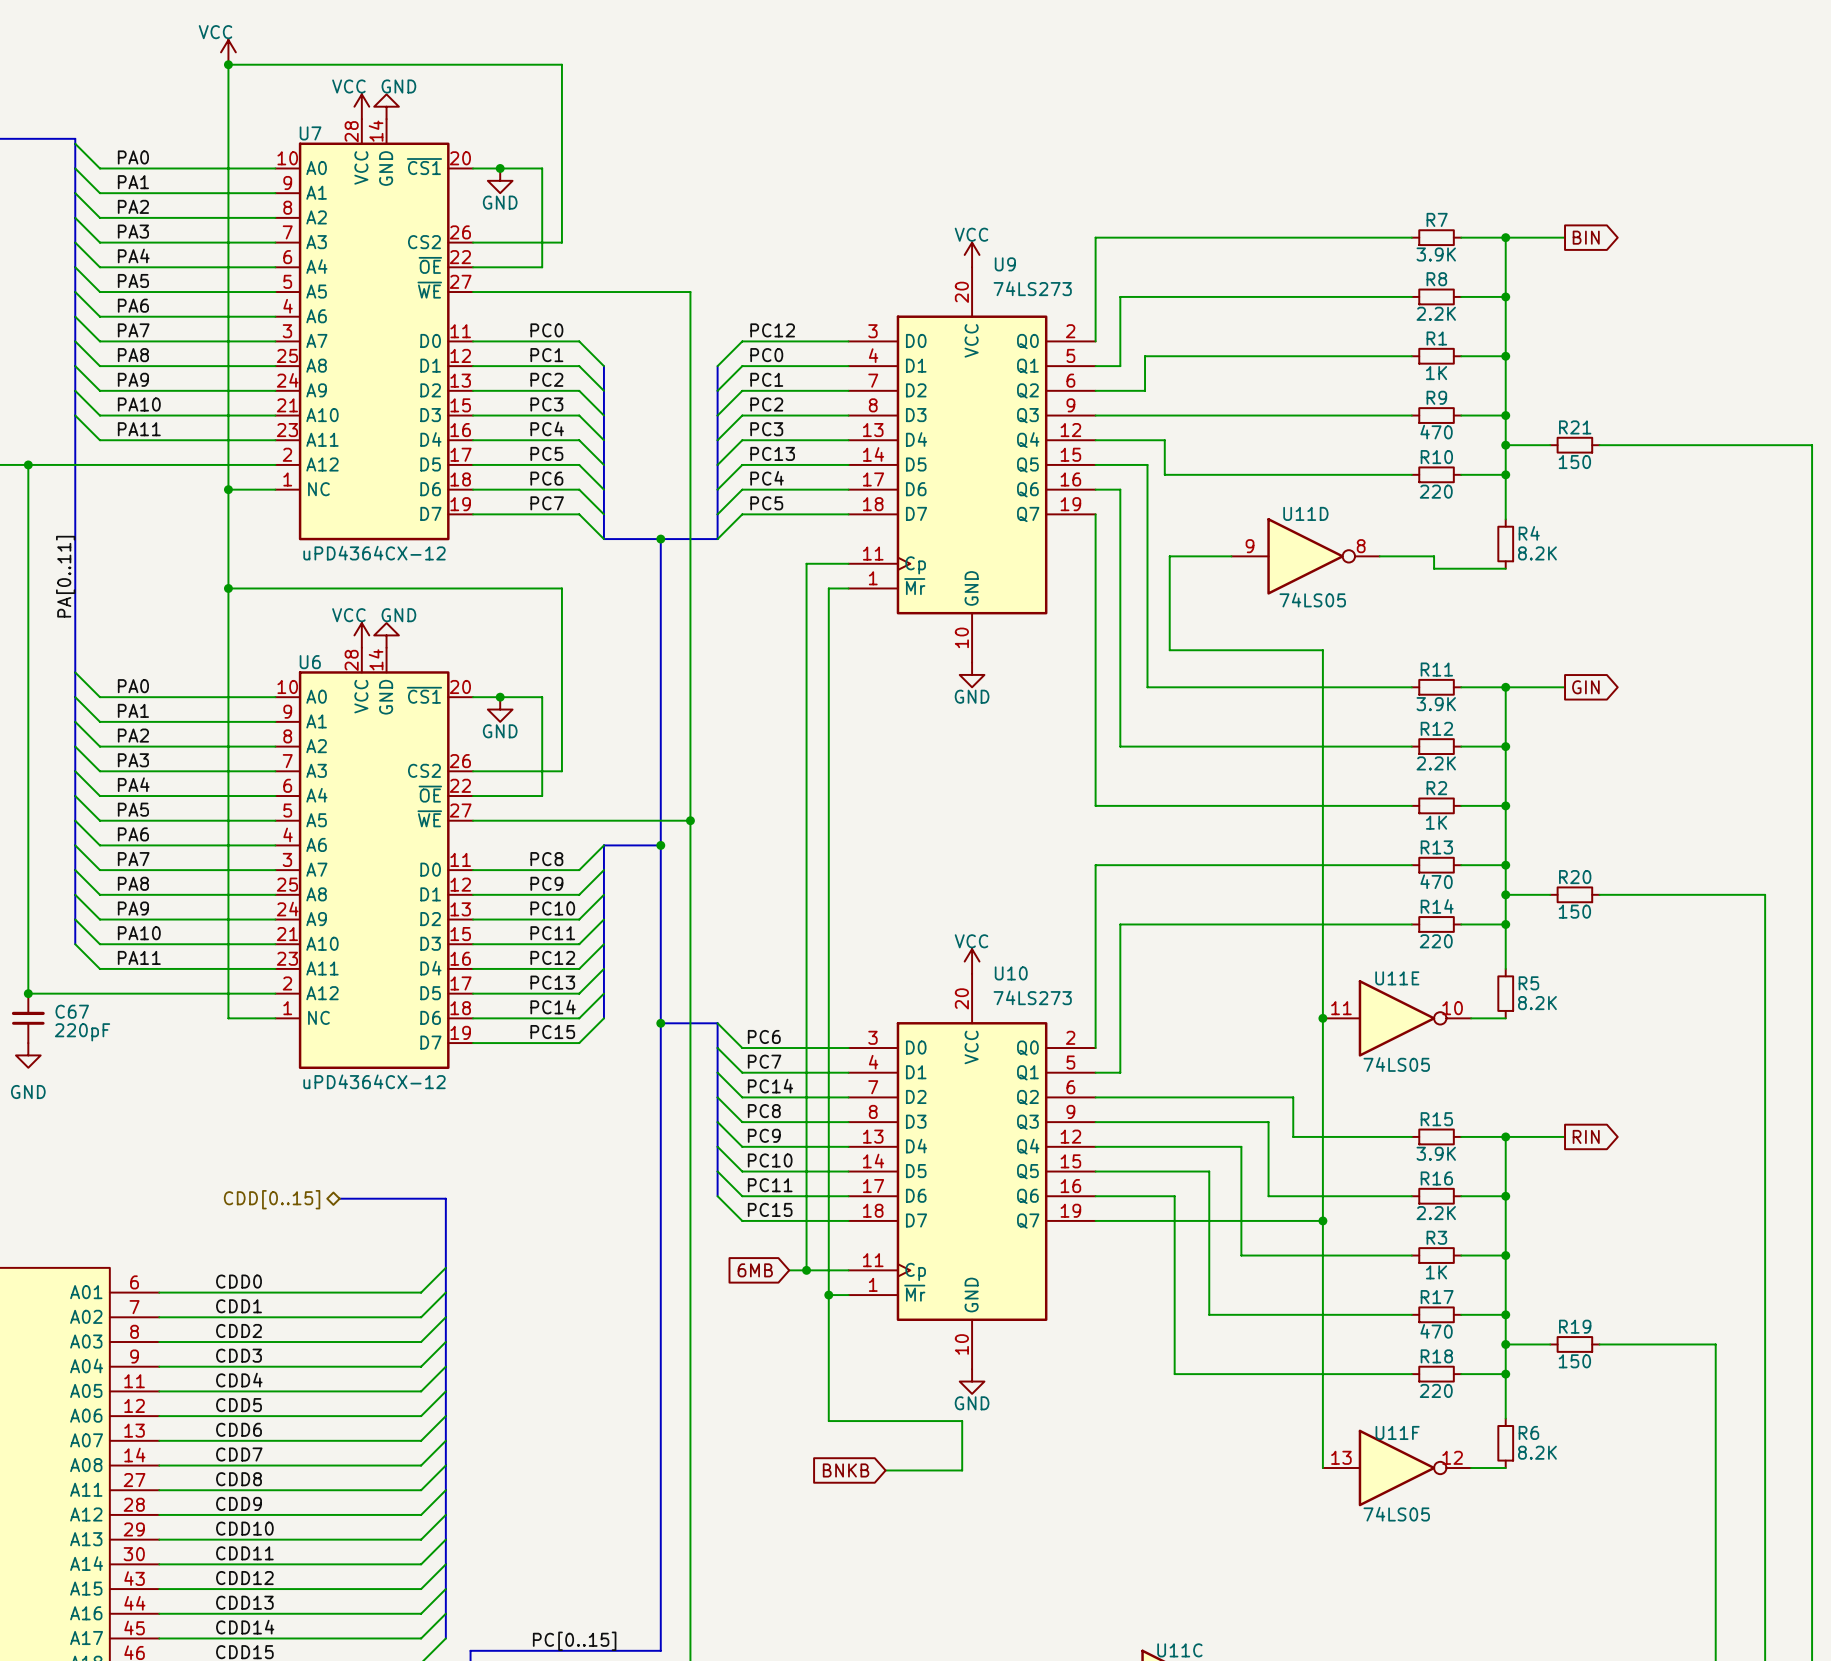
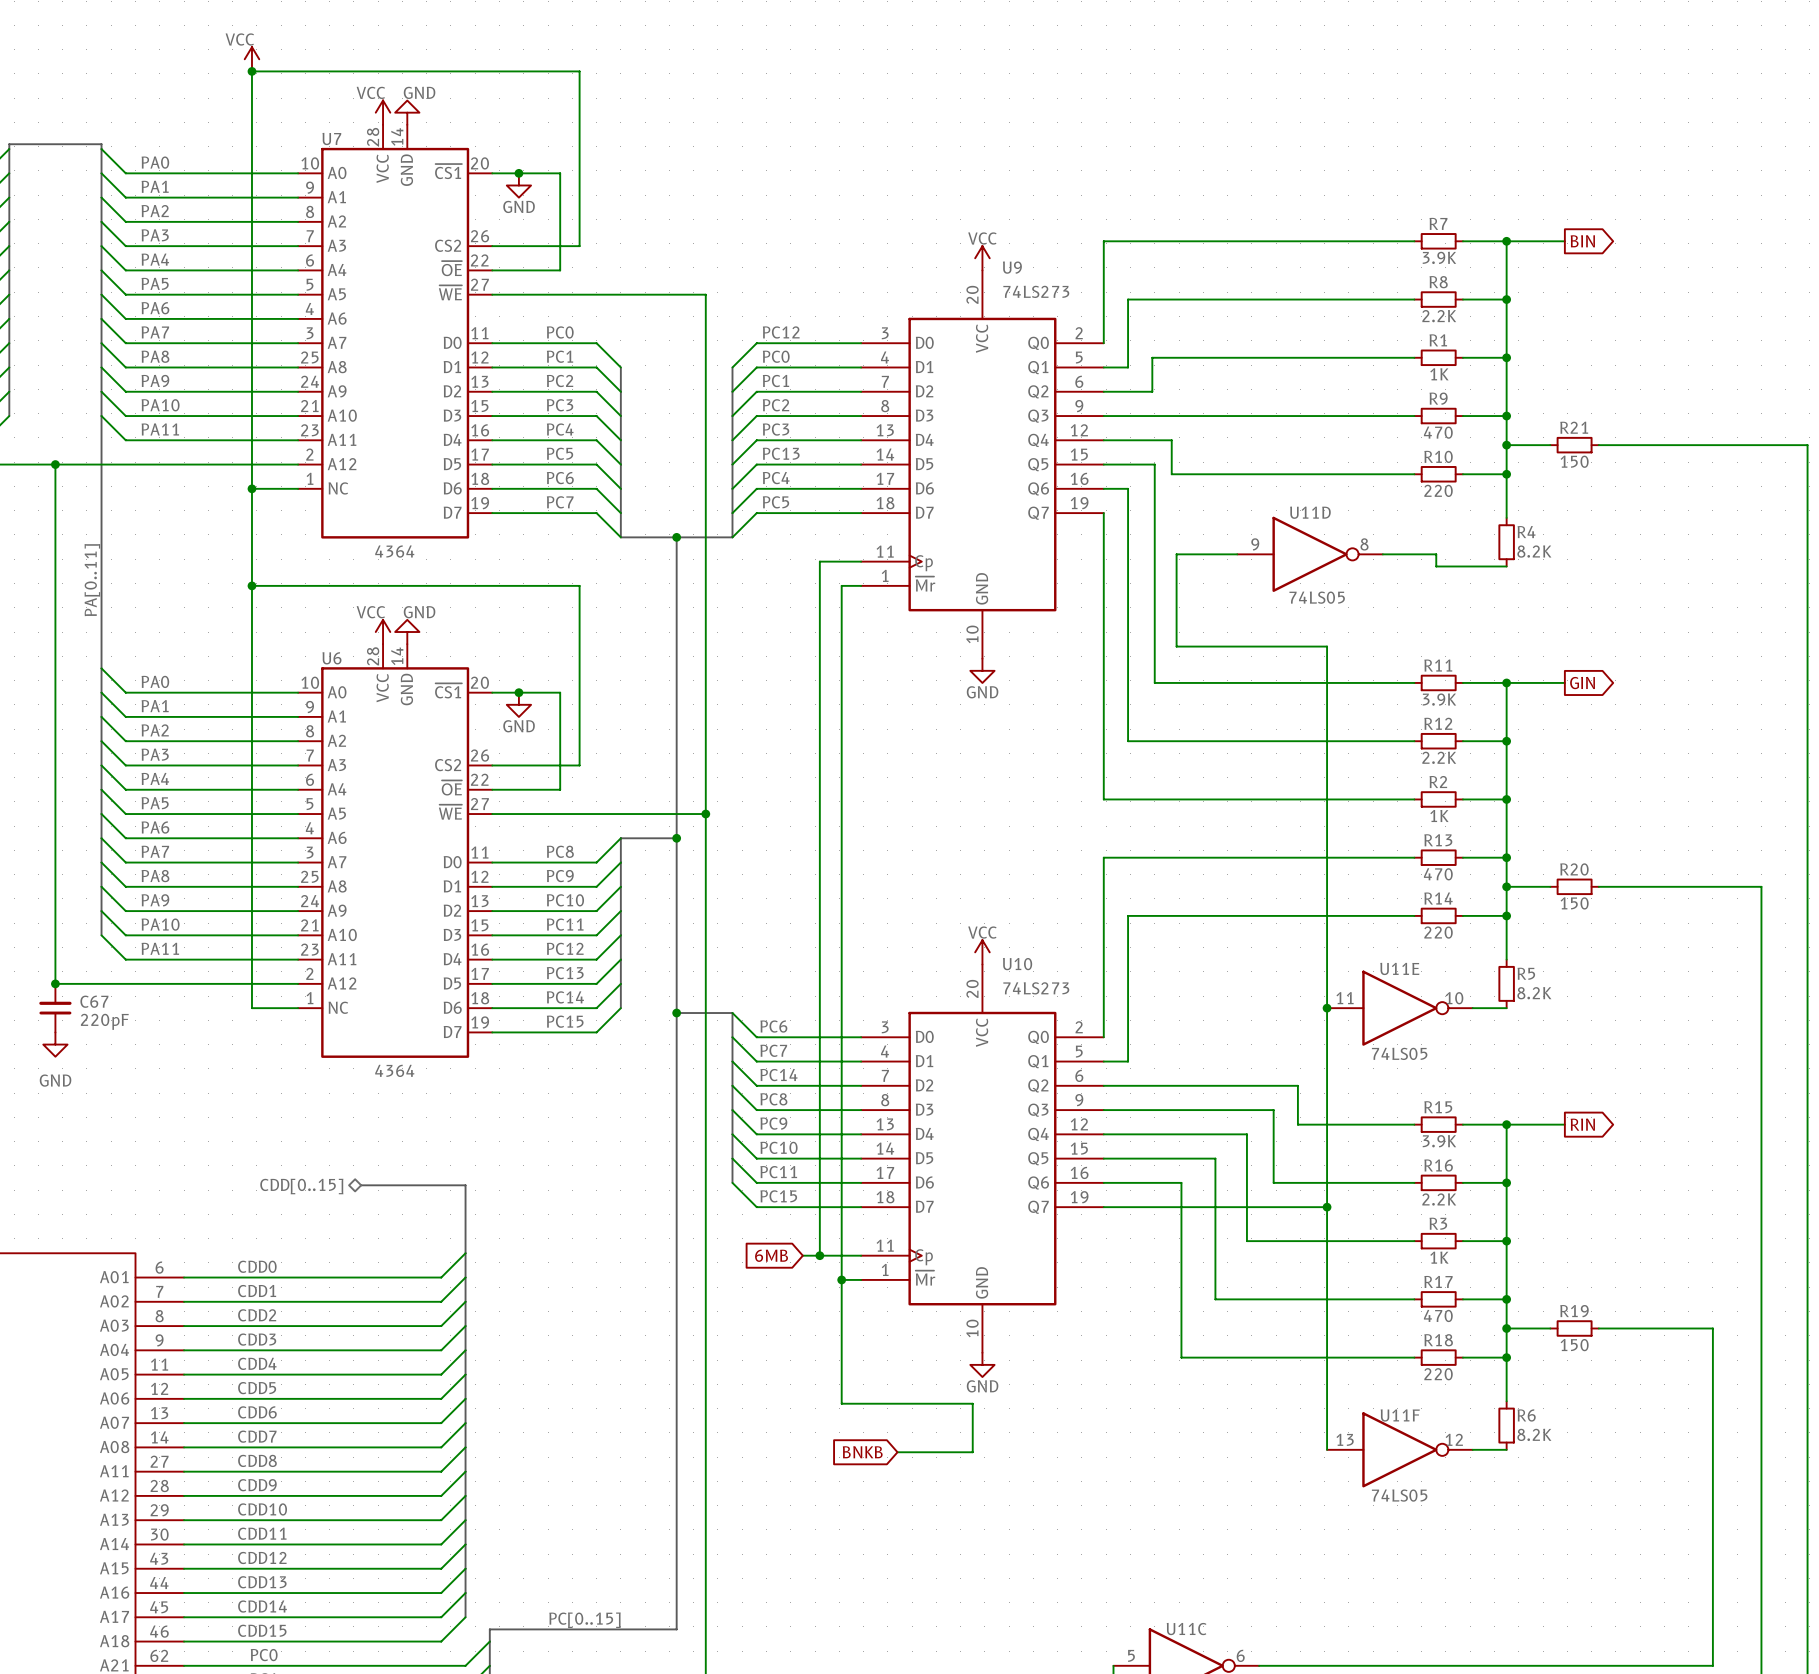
U7 value: uPD4364CX-12 (374, 553) -> 4364 (394, 551)
U6 value: uPD4364CX-12 (374, 1081) -> 4364 (394, 1070)

